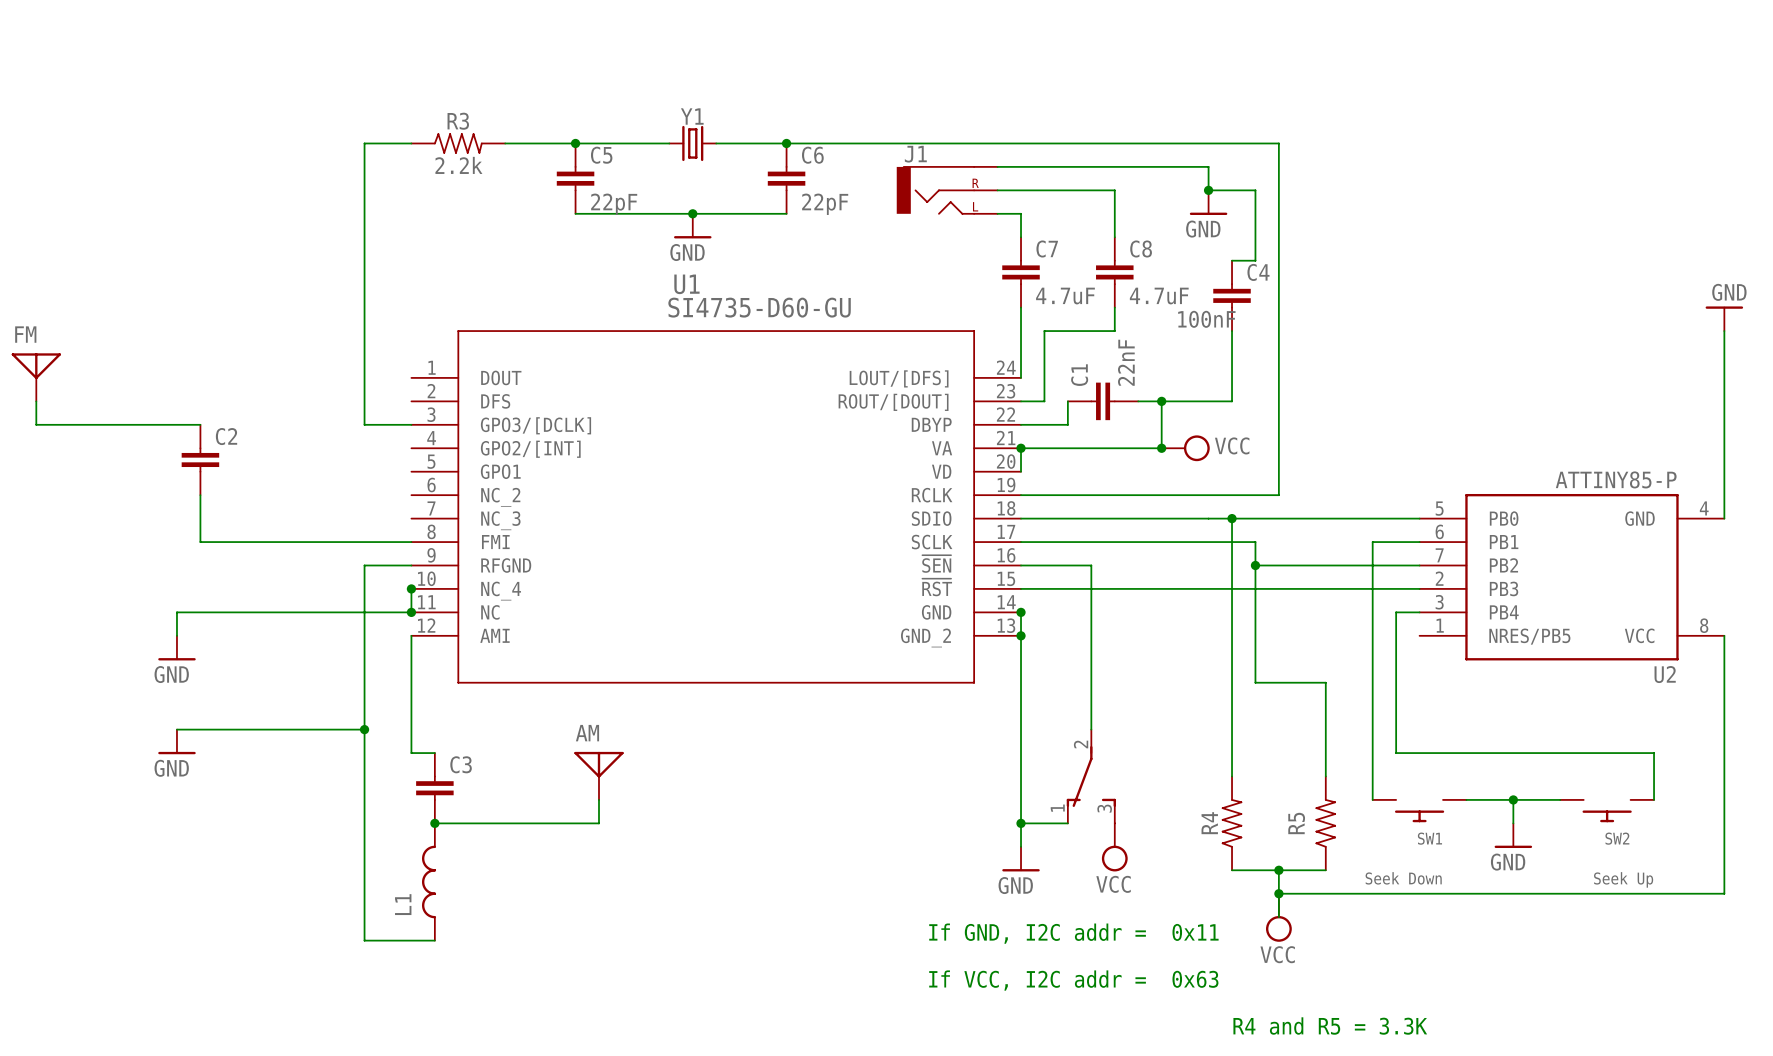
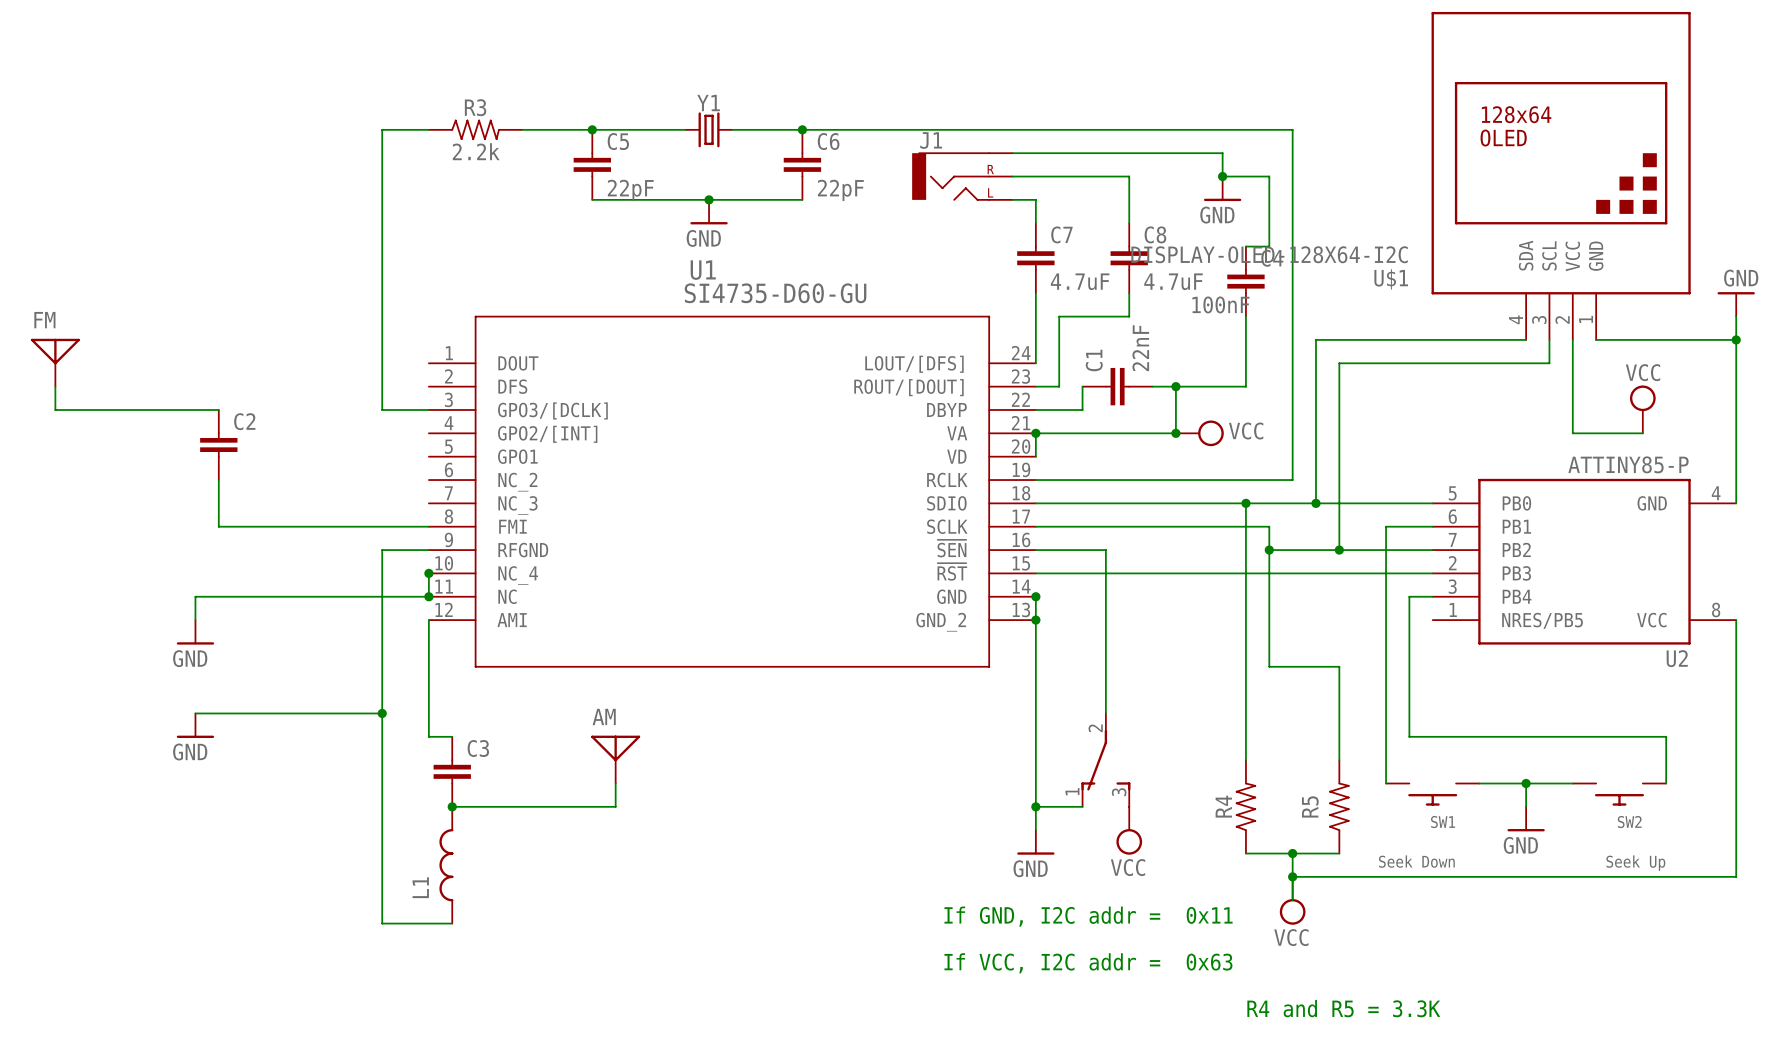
U$1: none -> DISPLAY-OLED-128X64-I2C (1561, 175)
wire: none -> (1526, 339) (1316, 339) (1316, 503)
wire: none -> (1549, 339) (1549, 363) (1339, 363) (1339, 550)
wire: none -> (1572, 339) (1572, 433) (1642, 433)
wire: none -> (1596, 339) (1736, 339)
junction: none -> (1736, 339)
power symbol: none -> VCC (1642, 409)
junction: none -> (1316, 503)
junction: none -> (1339, 550)

